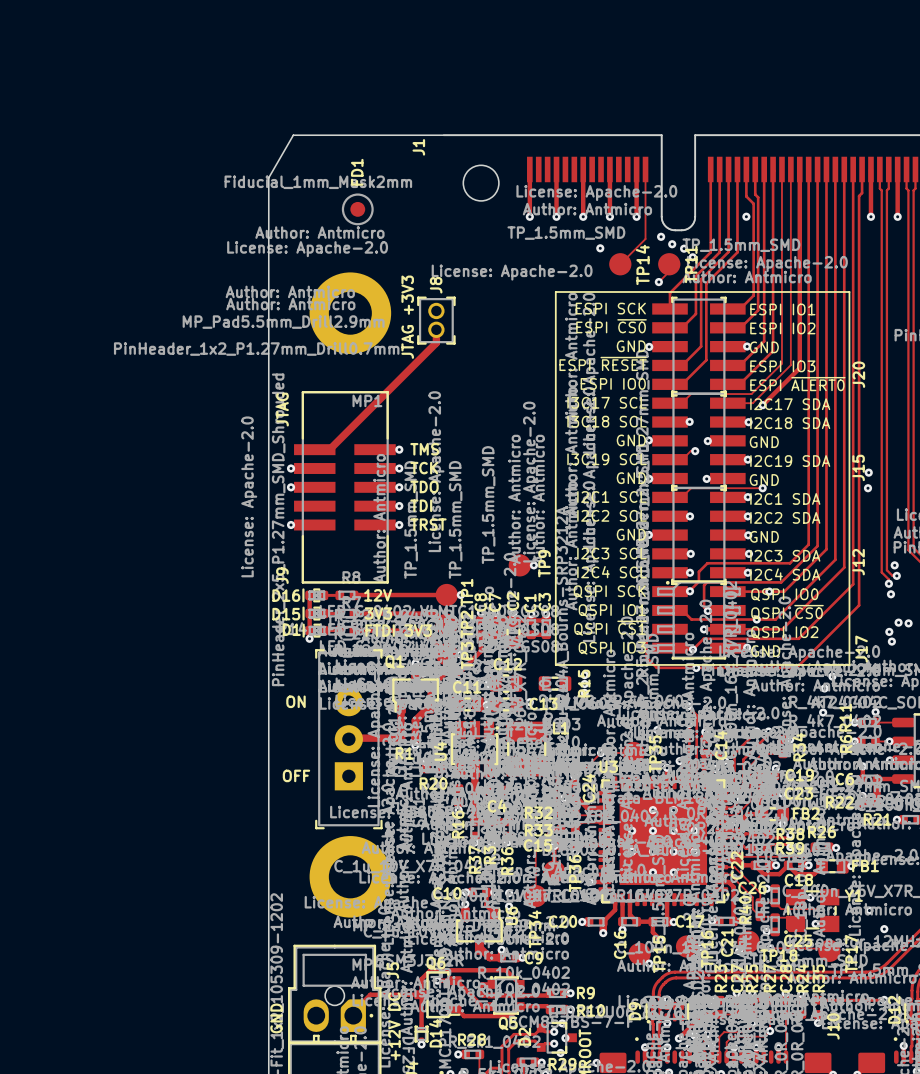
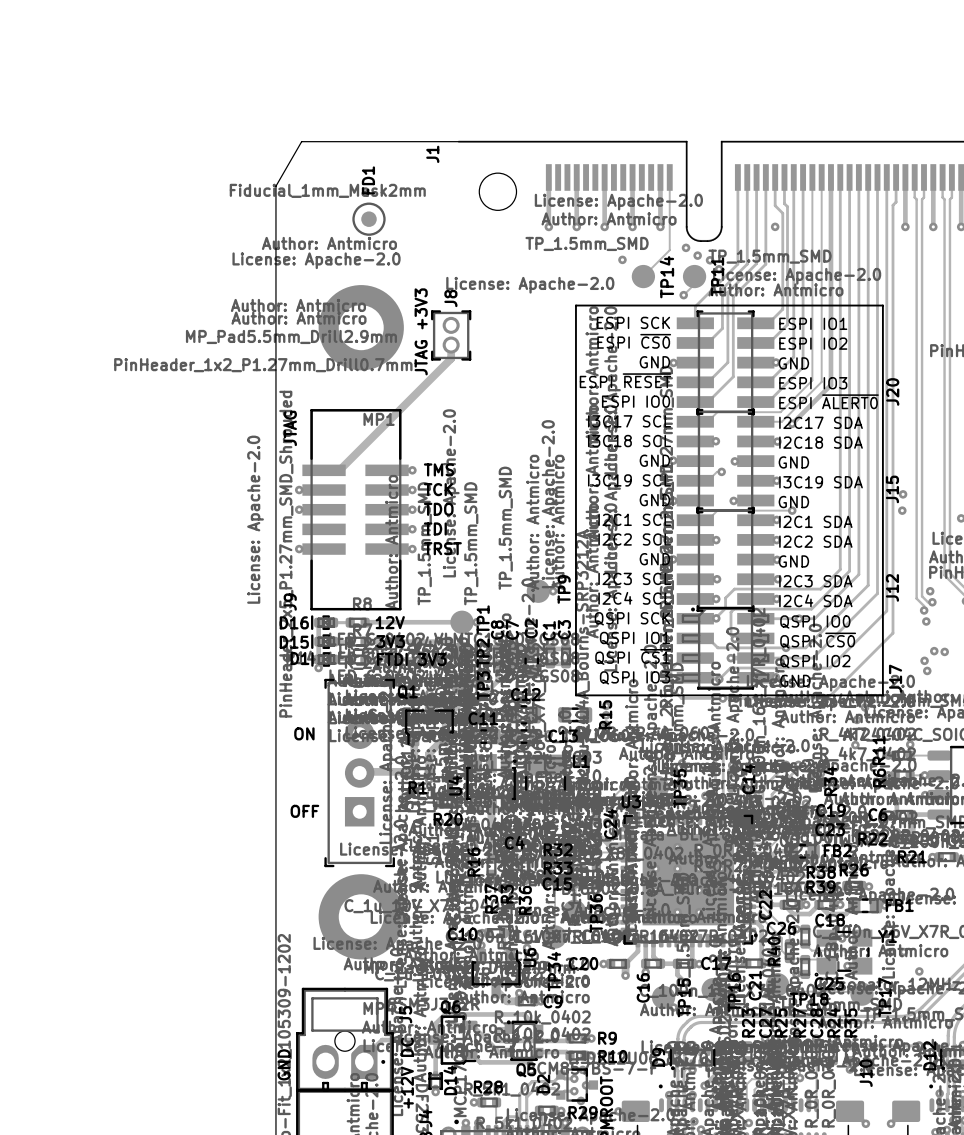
text: I2C19 SDA (790, 461) -> I3C19 SDA (821, 482)

